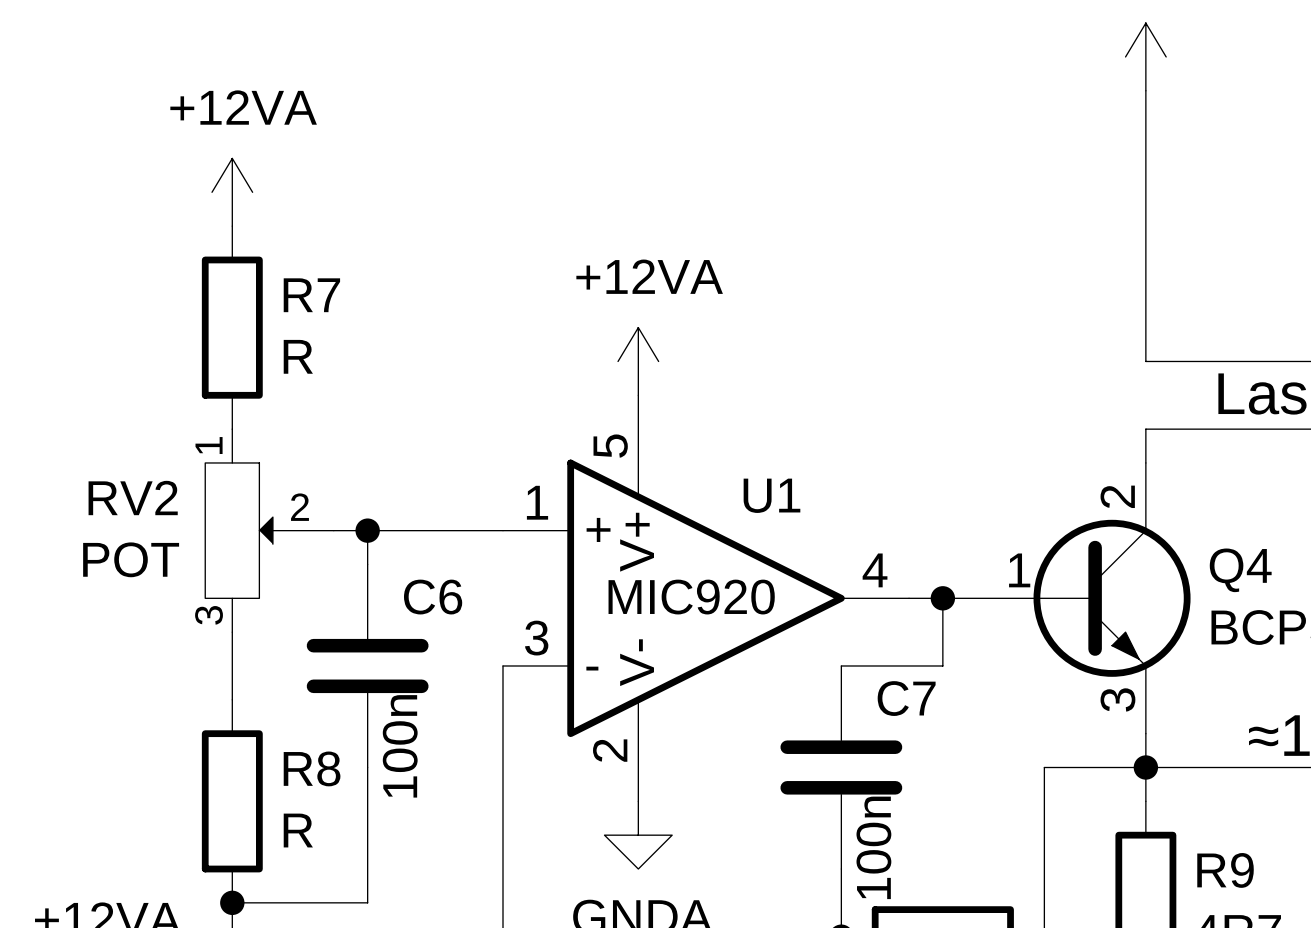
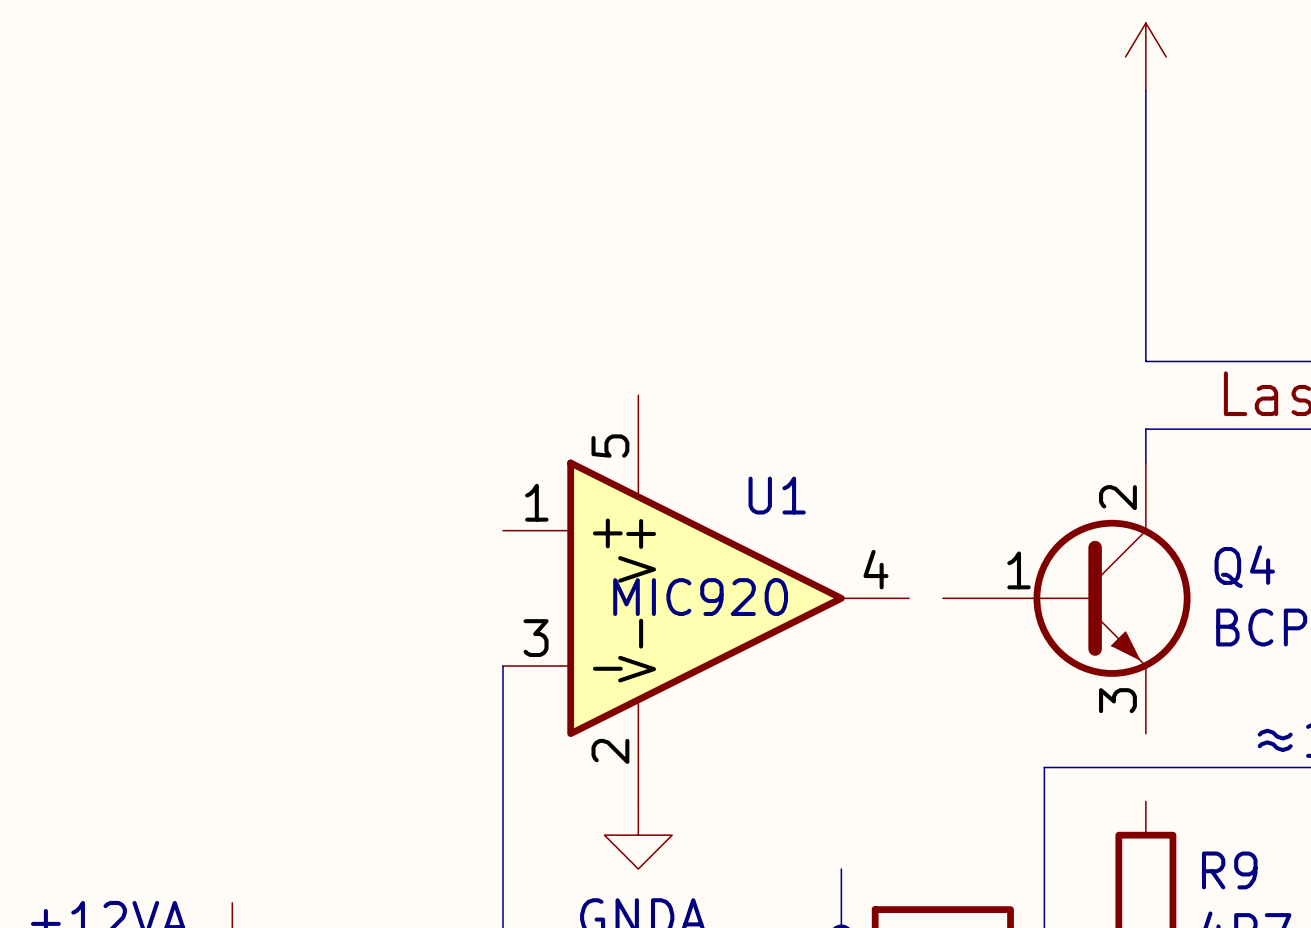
power symbol: +12VA (232, 192) -> none
R7: R (232, 327) -> none
power symbol: +12VA (638, 361) -> none
RV2: POT (269, 530) -> none
wire: (333, 530) (502, 530) -> none
wire: (367, 530) (367, 564) -> none
junction: (367, 530) -> none
wire: (909, 598) (942, 598) (942, 665) (841, 665) -> none
junction: (942, 598) -> none
wire: (232, 632) (232, 699) -> none
C6: 100n (367, 665) -> none
wire: (1145, 733) (1145, 801) -> none
wire: (367, 767) (367, 902) (232, 902) -> none
C7: 100n (841, 767) -> none
junction: (1145, 767) -> none
R8: R (232, 801) -> none
junction: (232, 902) -> none

